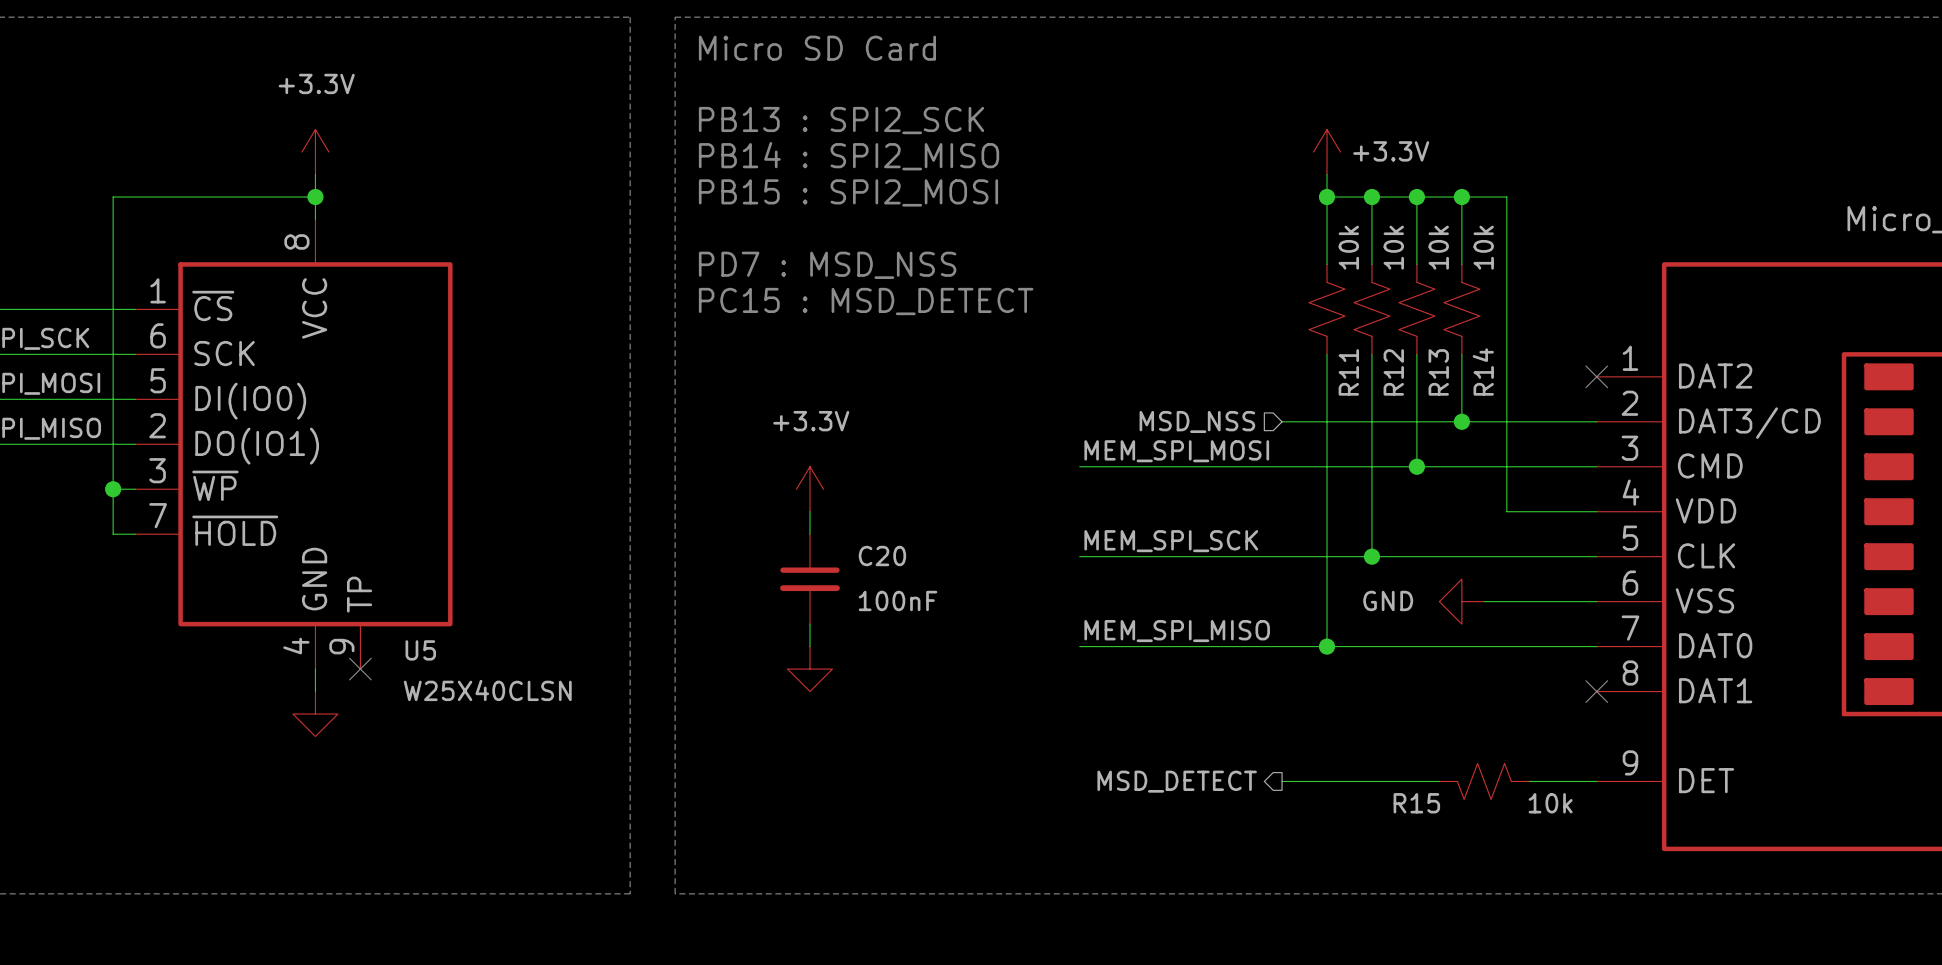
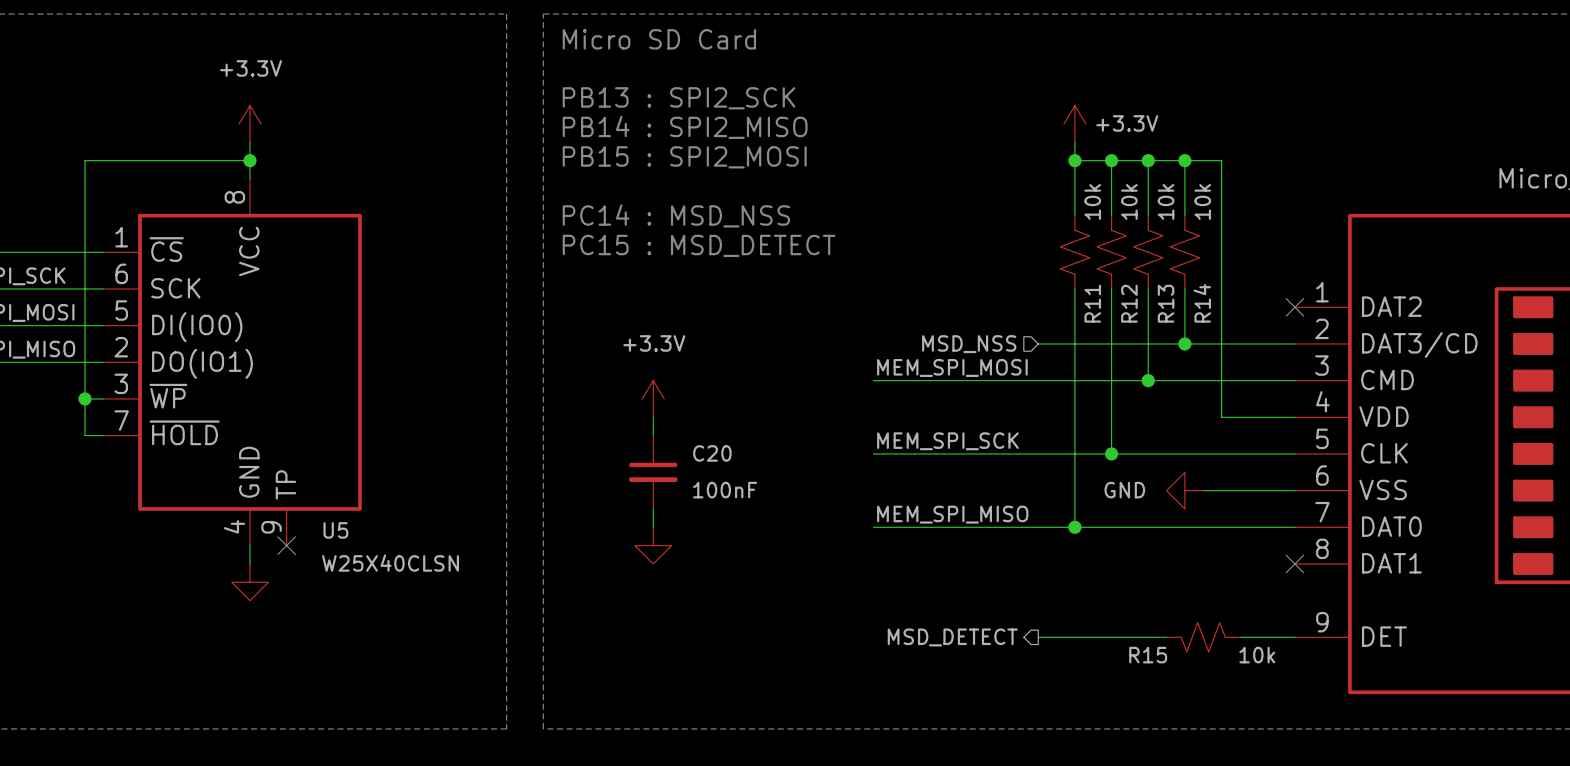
text: PD7 : MSD_NSS (827, 265) -> PC14 : MSD_NSS (676, 215)

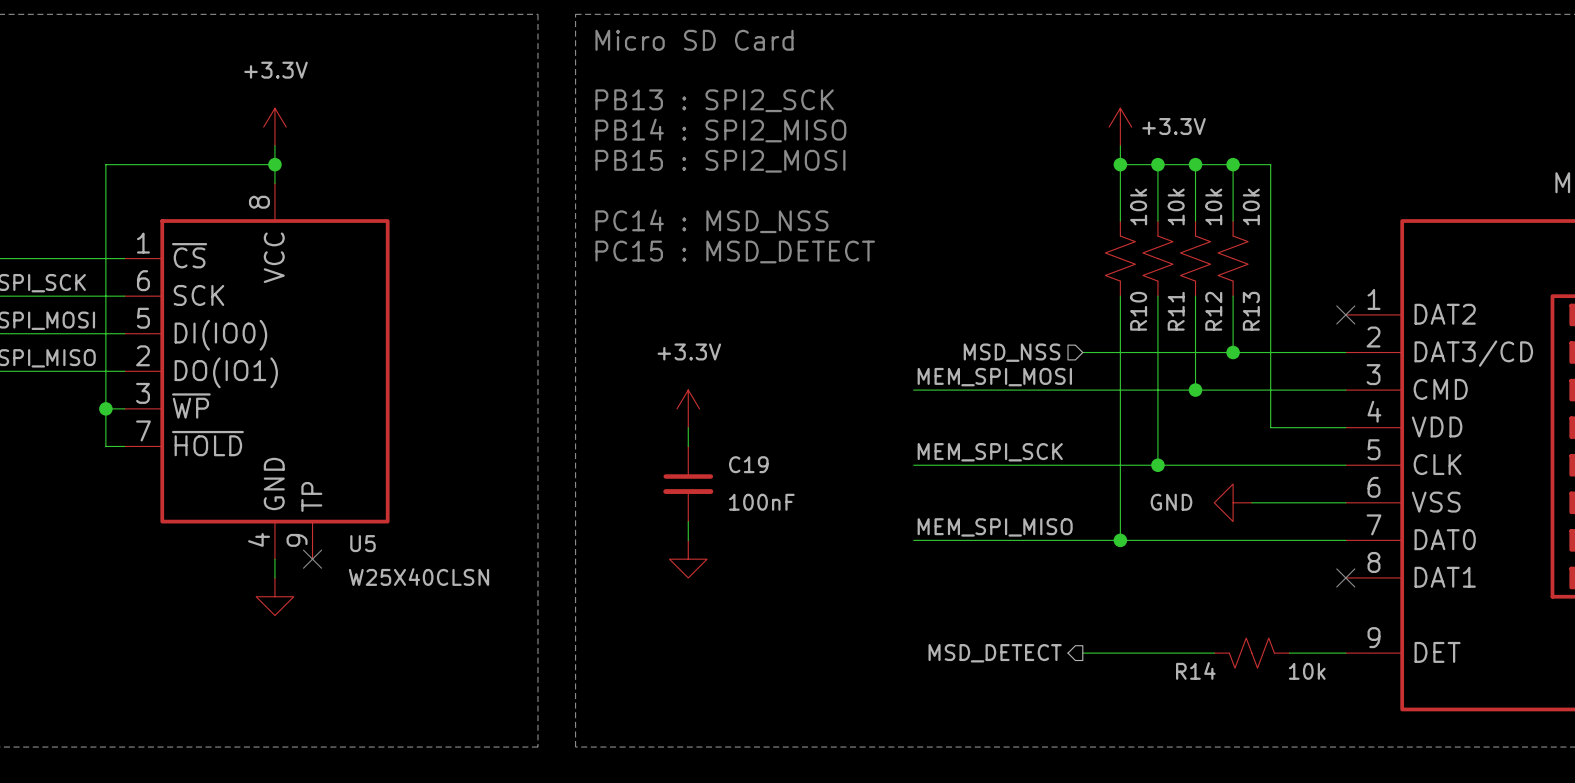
R11 name: R11 (1092, 303) -> R10 (1138, 311)
R12 name: R12 (1129, 303) -> R11 (1176, 311)
R13 name: R13 (1166, 303) -> R12 (1213, 311)
R14 name: R14 (1202, 303) -> R13 (1251, 311)
C20 name: C20 (712, 453) -> C19 (748, 464)
R15 name: R15 (1148, 655) -> R14 (1195, 670)

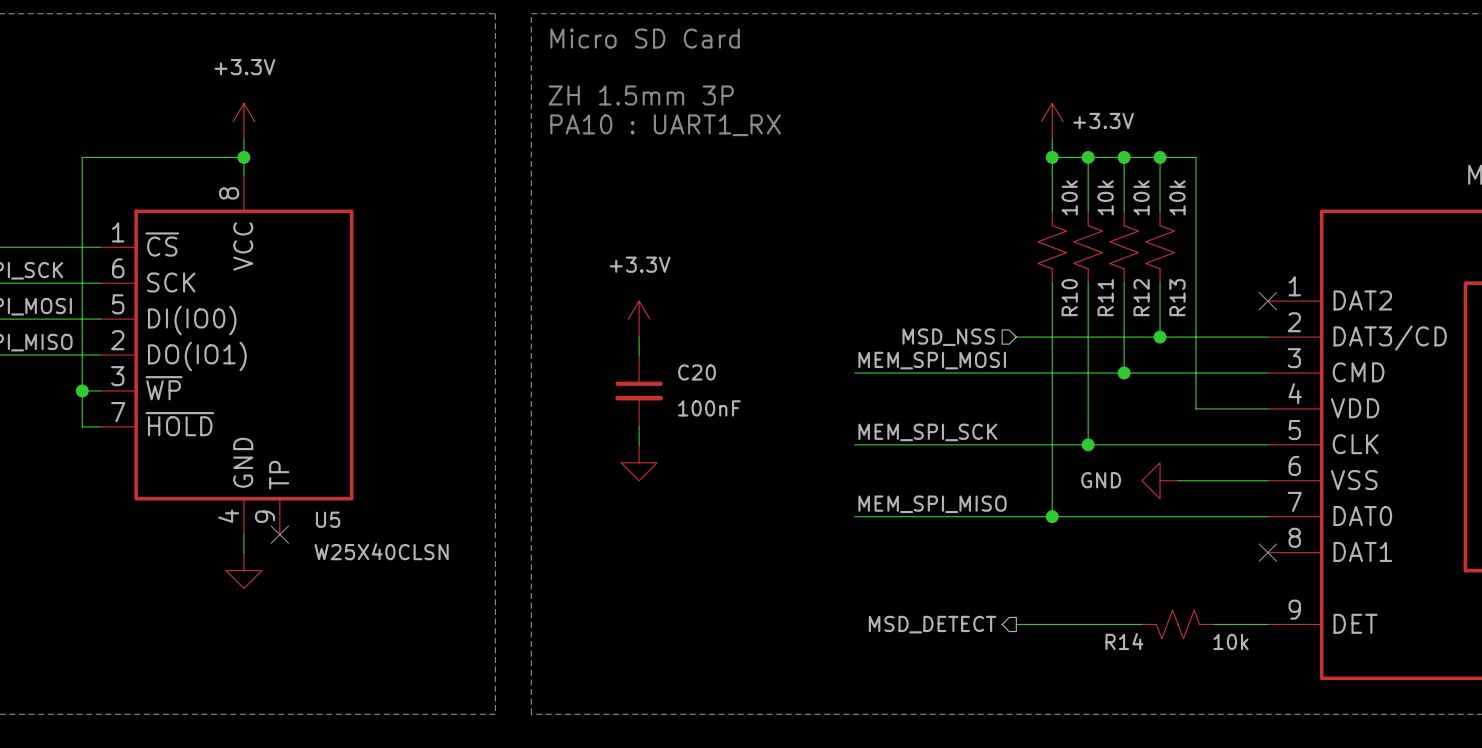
text: PB13 : SPI2_SCK (714, 100) -> ZH 1.5mm 3P (641, 95)
text: PB14 : SPI2_MISO (720, 130) -> PA10 : UART1_RX (665, 125)
text: PB15 : SPI2_MOSI (720, 161) -> none
text: PC14 : MSD_NSS (711, 221) -> none
text: PC15 : MSD_DETECT (735, 251) -> none
power symbol position: +3.3V (688, 408) -> +3.3V (639, 319)
C20: none -> 100nF (639, 390)
C19: 100nF (688, 484) -> none
wire: (688, 521) (688, 540) -> (639, 337) (639, 355)
power symbol position: (688, 559) -> (639, 462)

